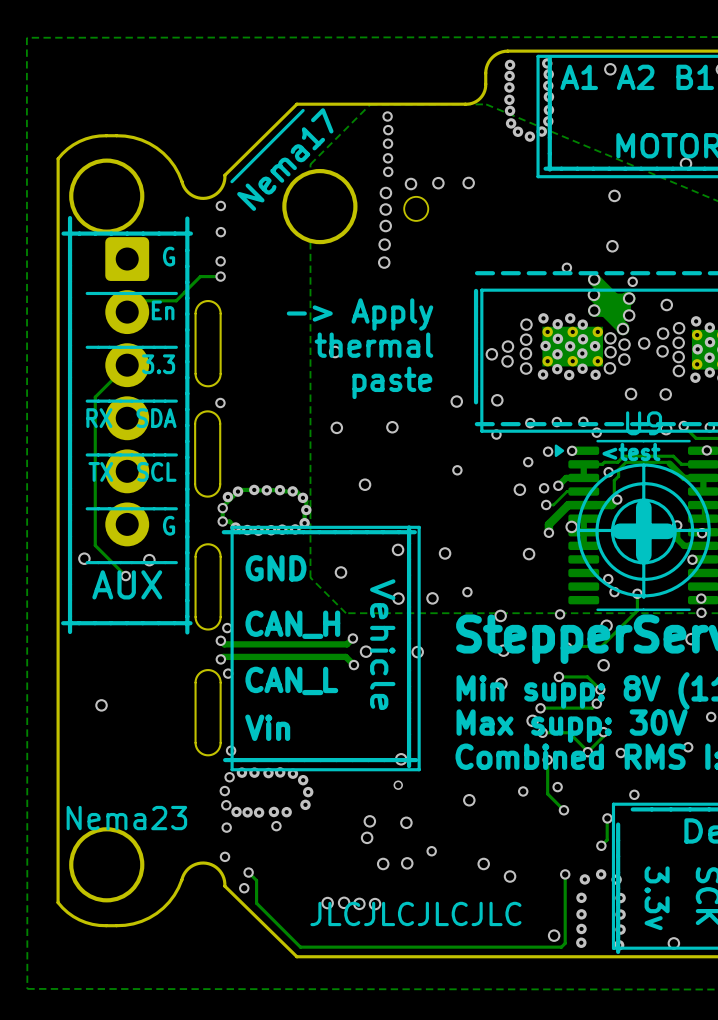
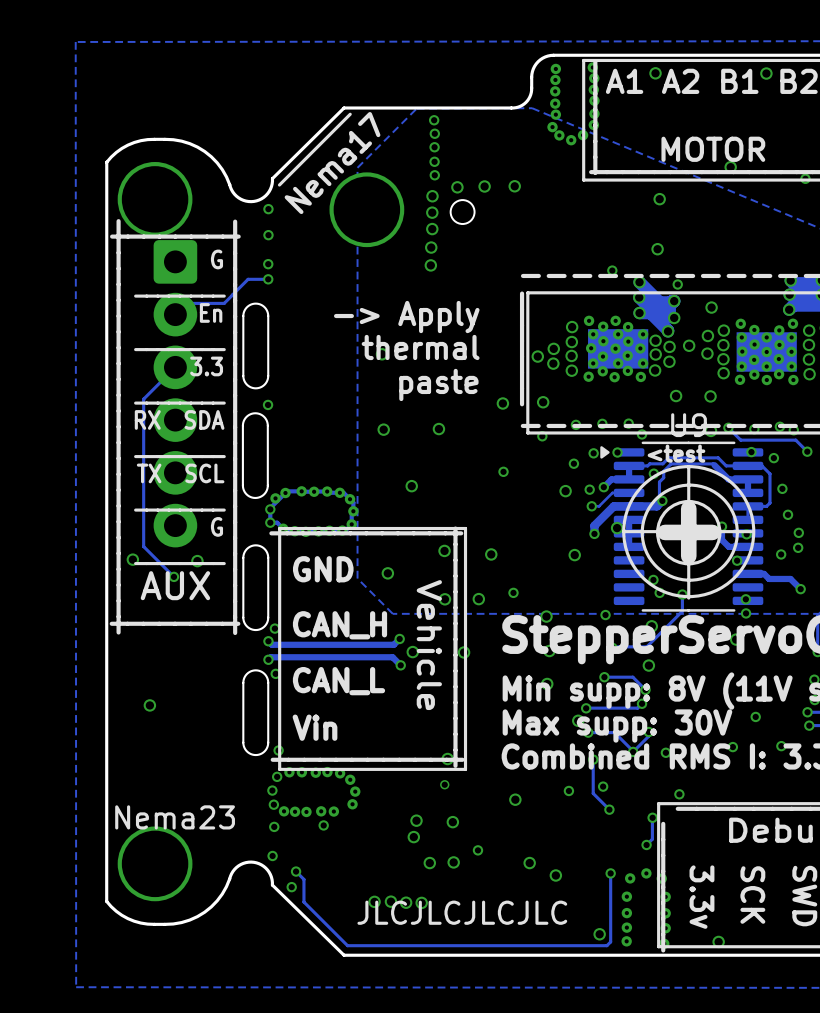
via: none -> (552, 127)
via: (511, 123) -> none
via: none -> (559, 135)
via: (517, 131) -> none
via: none -> (583, 135)
via: (541, 131) -> none
via: none -> (571, 140)
via: (529, 136) -> none

